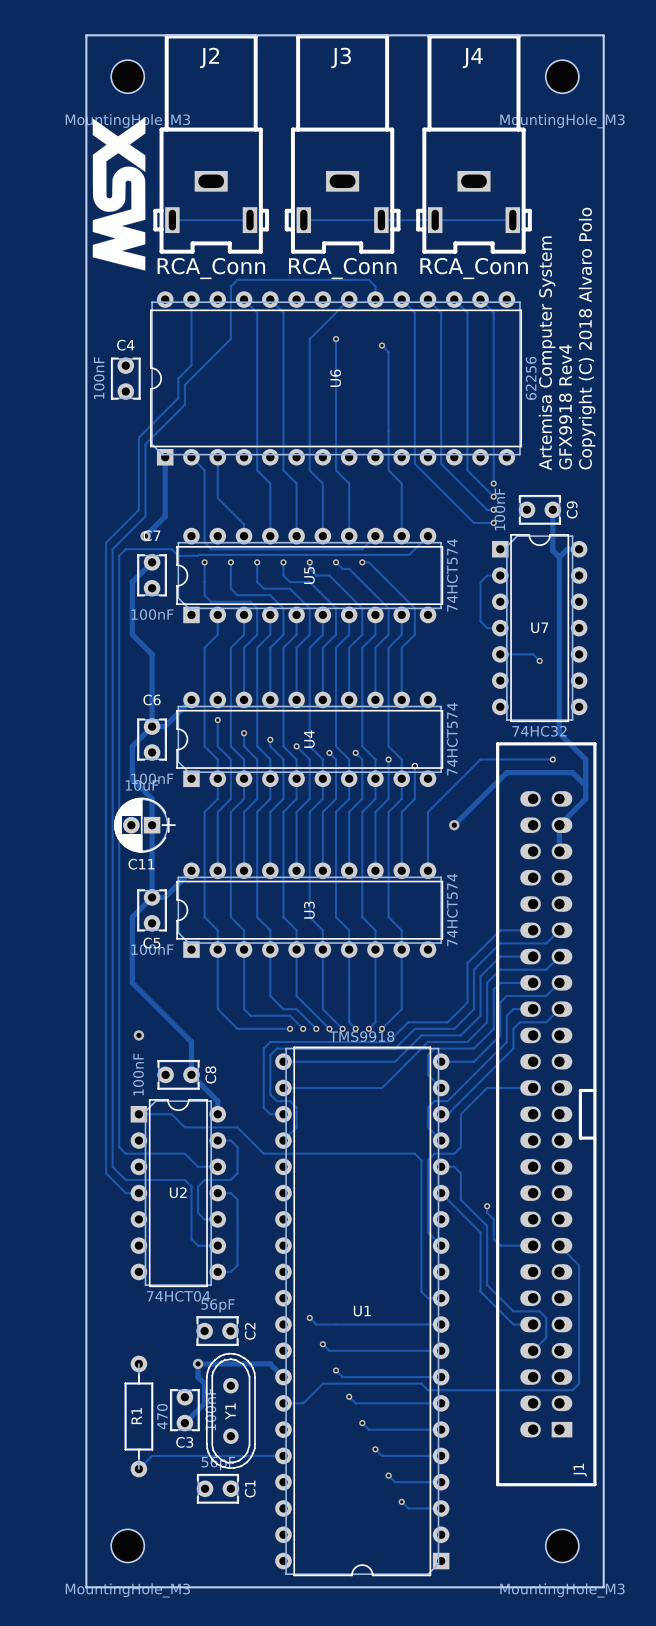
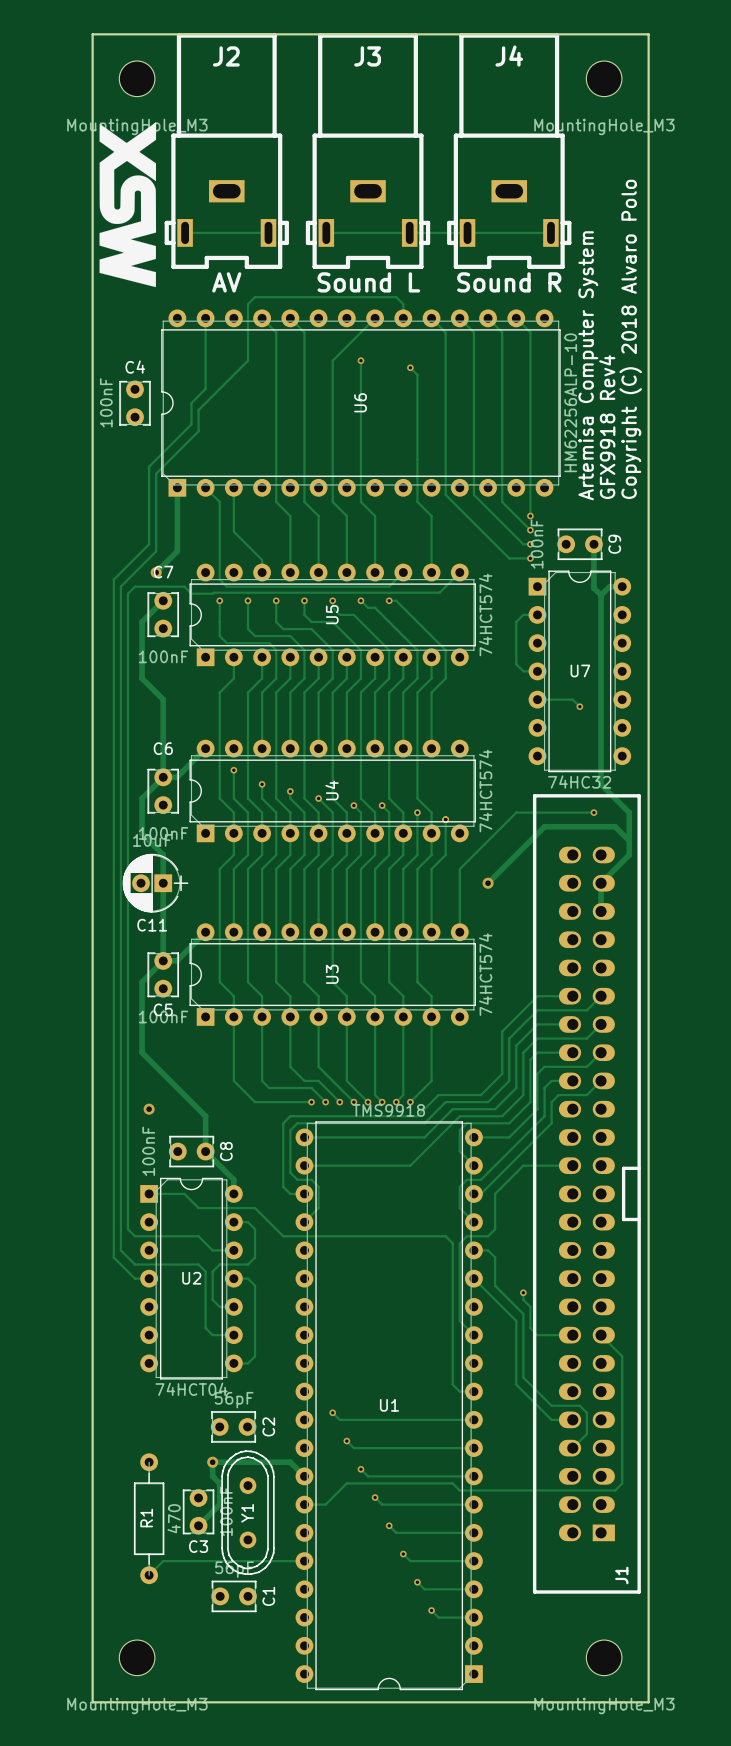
J2 value: RCA_Conn (211, 268) -> AV (226, 282)
J3 value: RCA_Conn (342, 268) -> Sound L (368, 282)
J4 value: RCA_Conn (474, 268) -> Sound R (509, 282)
U6 value: 62256 (531, 378) -> HM62256ALP-10 (570, 402)

